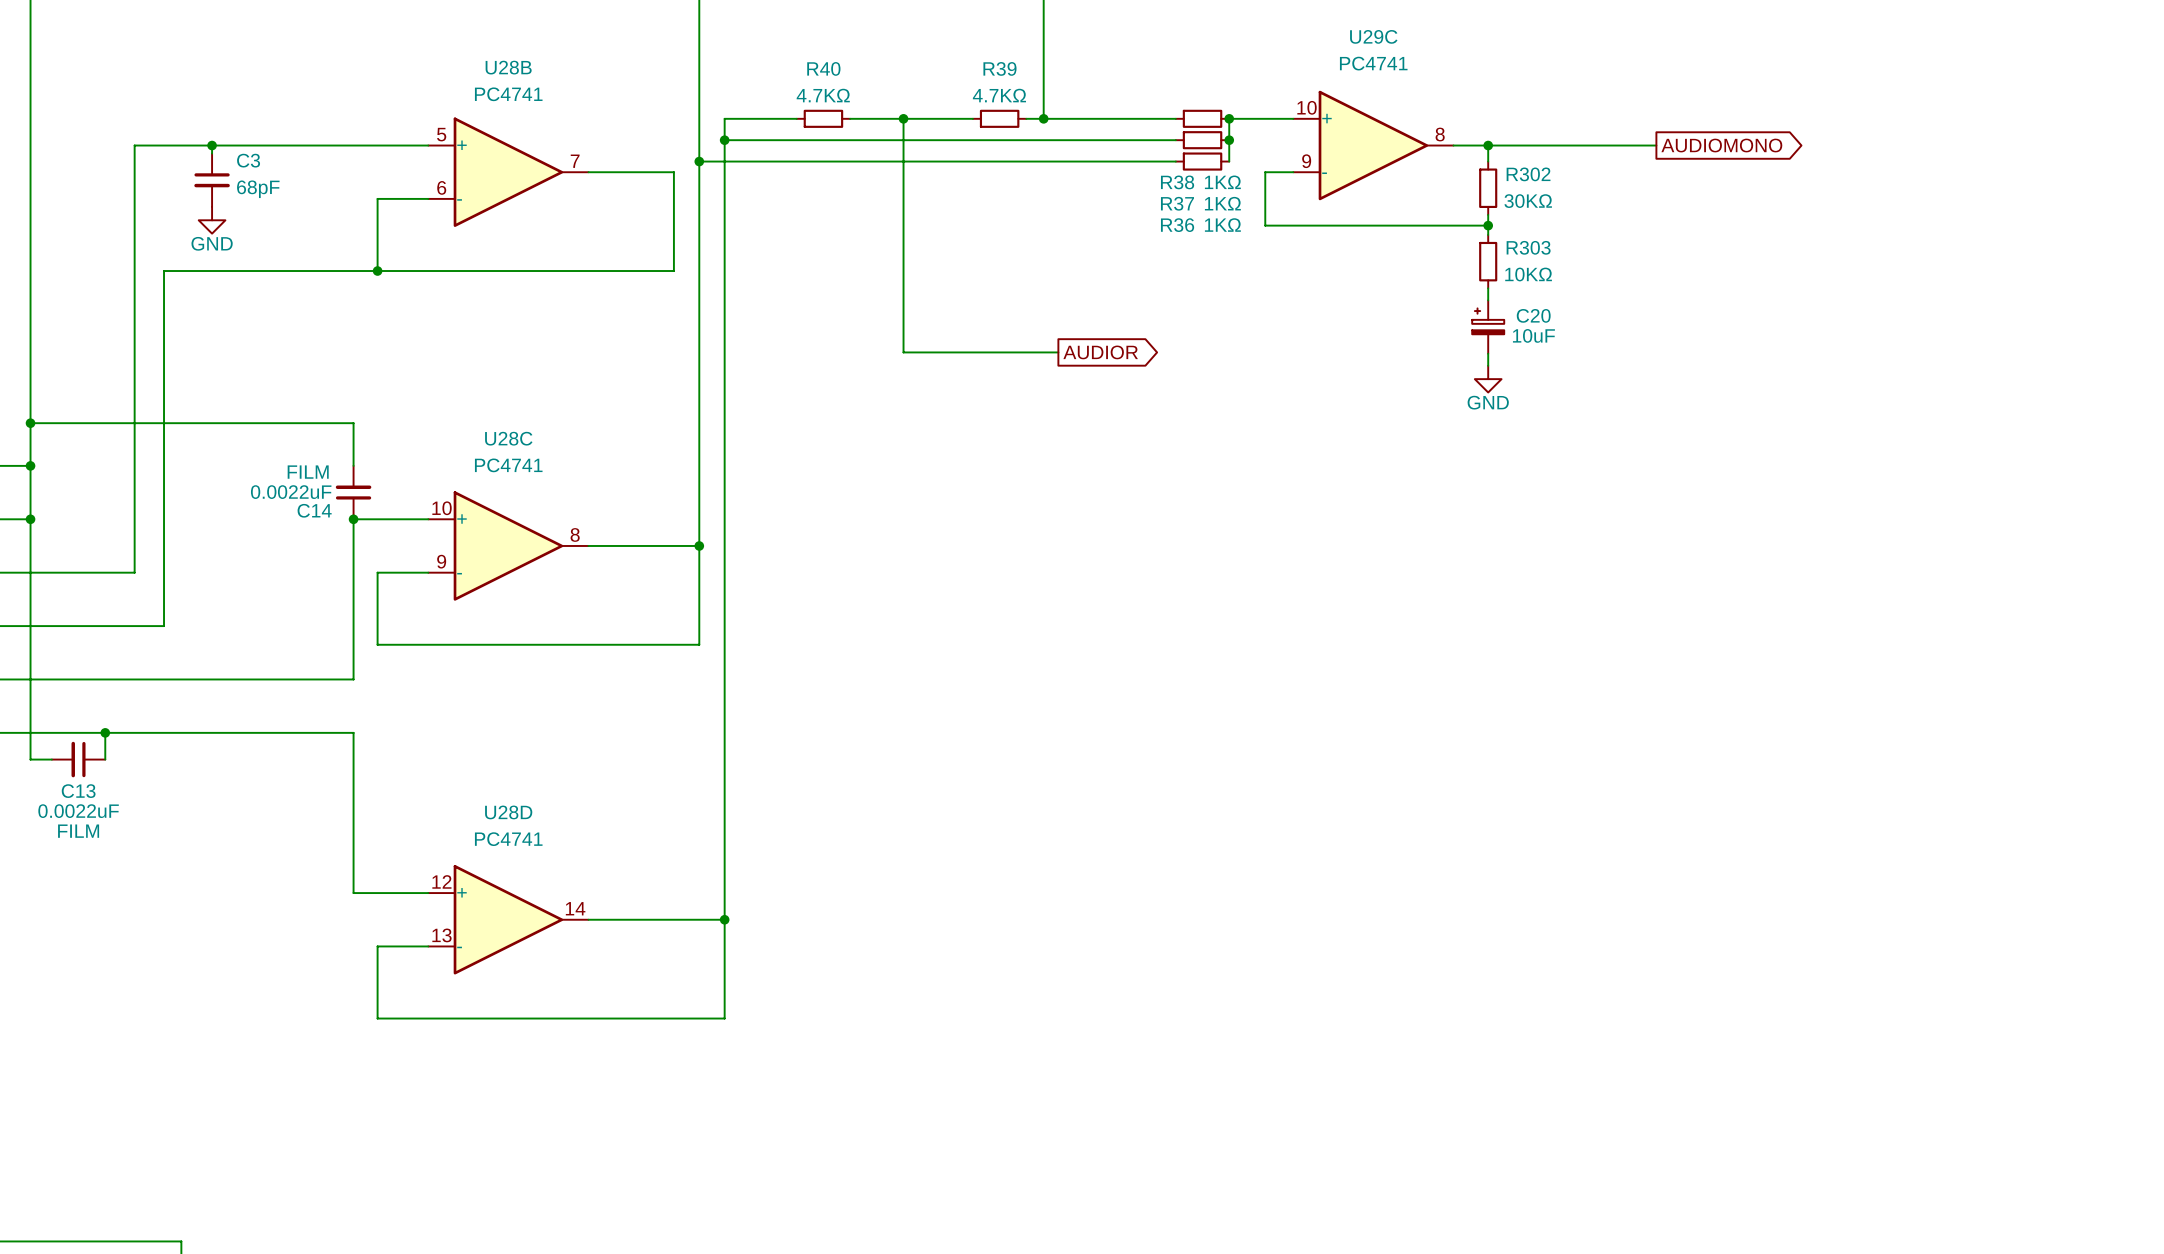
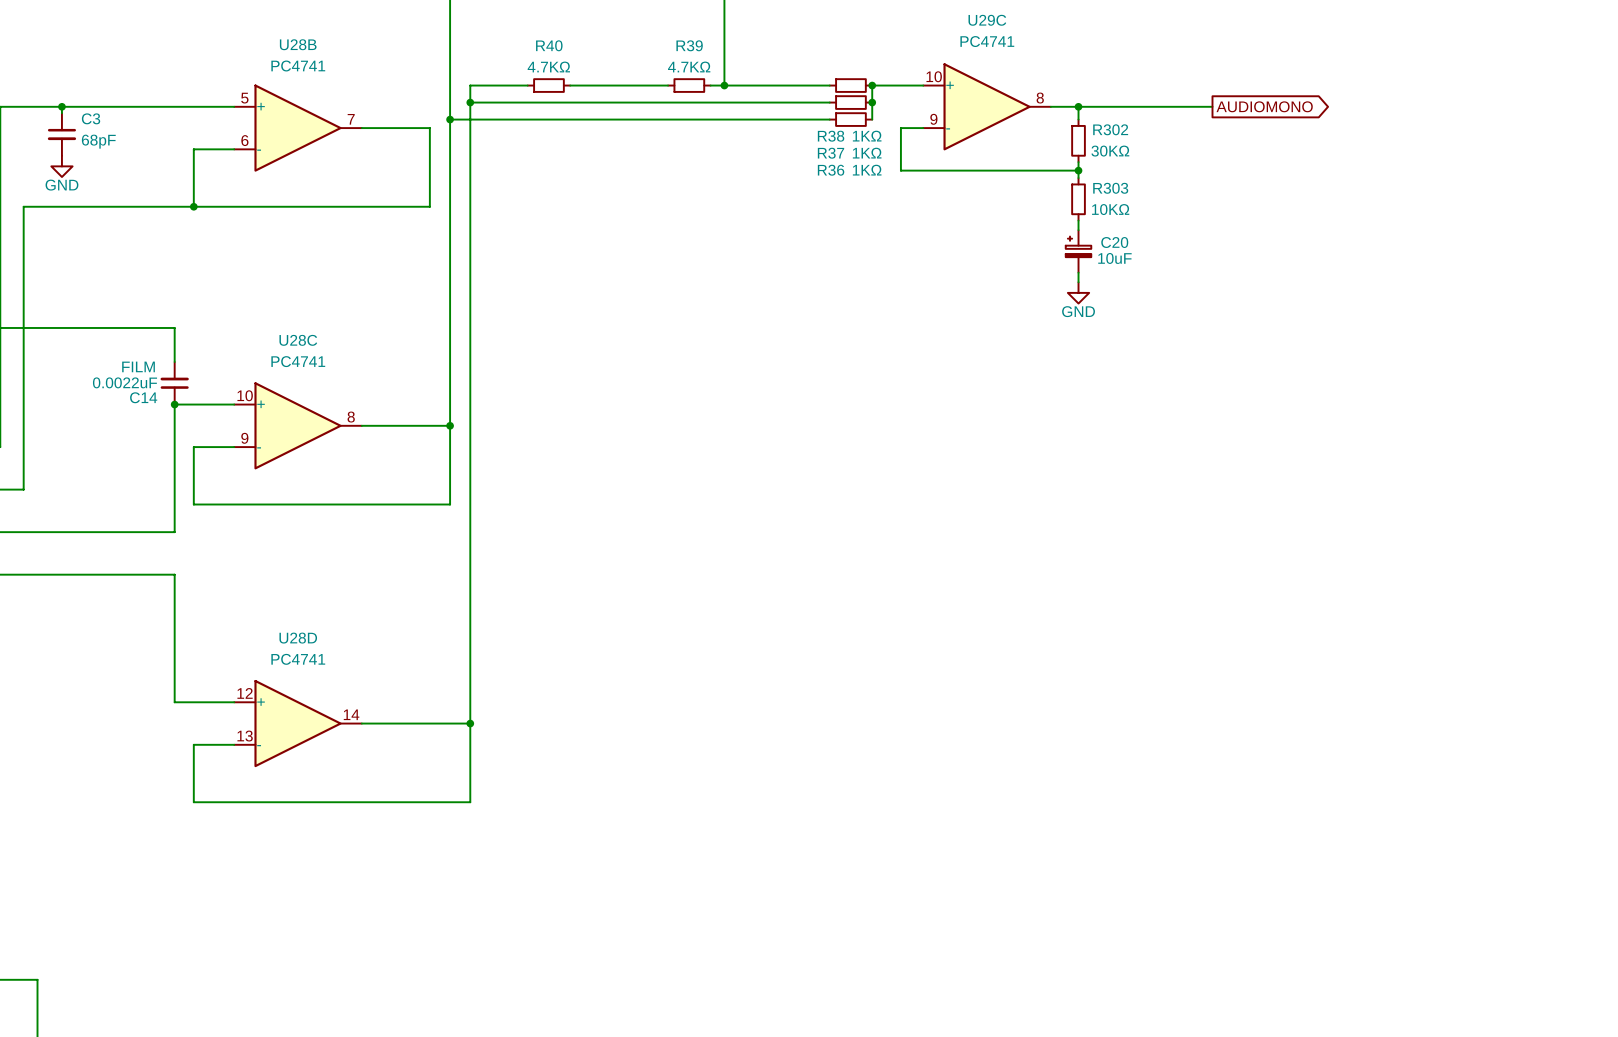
wire: (903, 118) (903, 352) (1058, 352) -> none
junction: (903, 118) -> none
global label: AUDIOR (1100, 352) -> none

